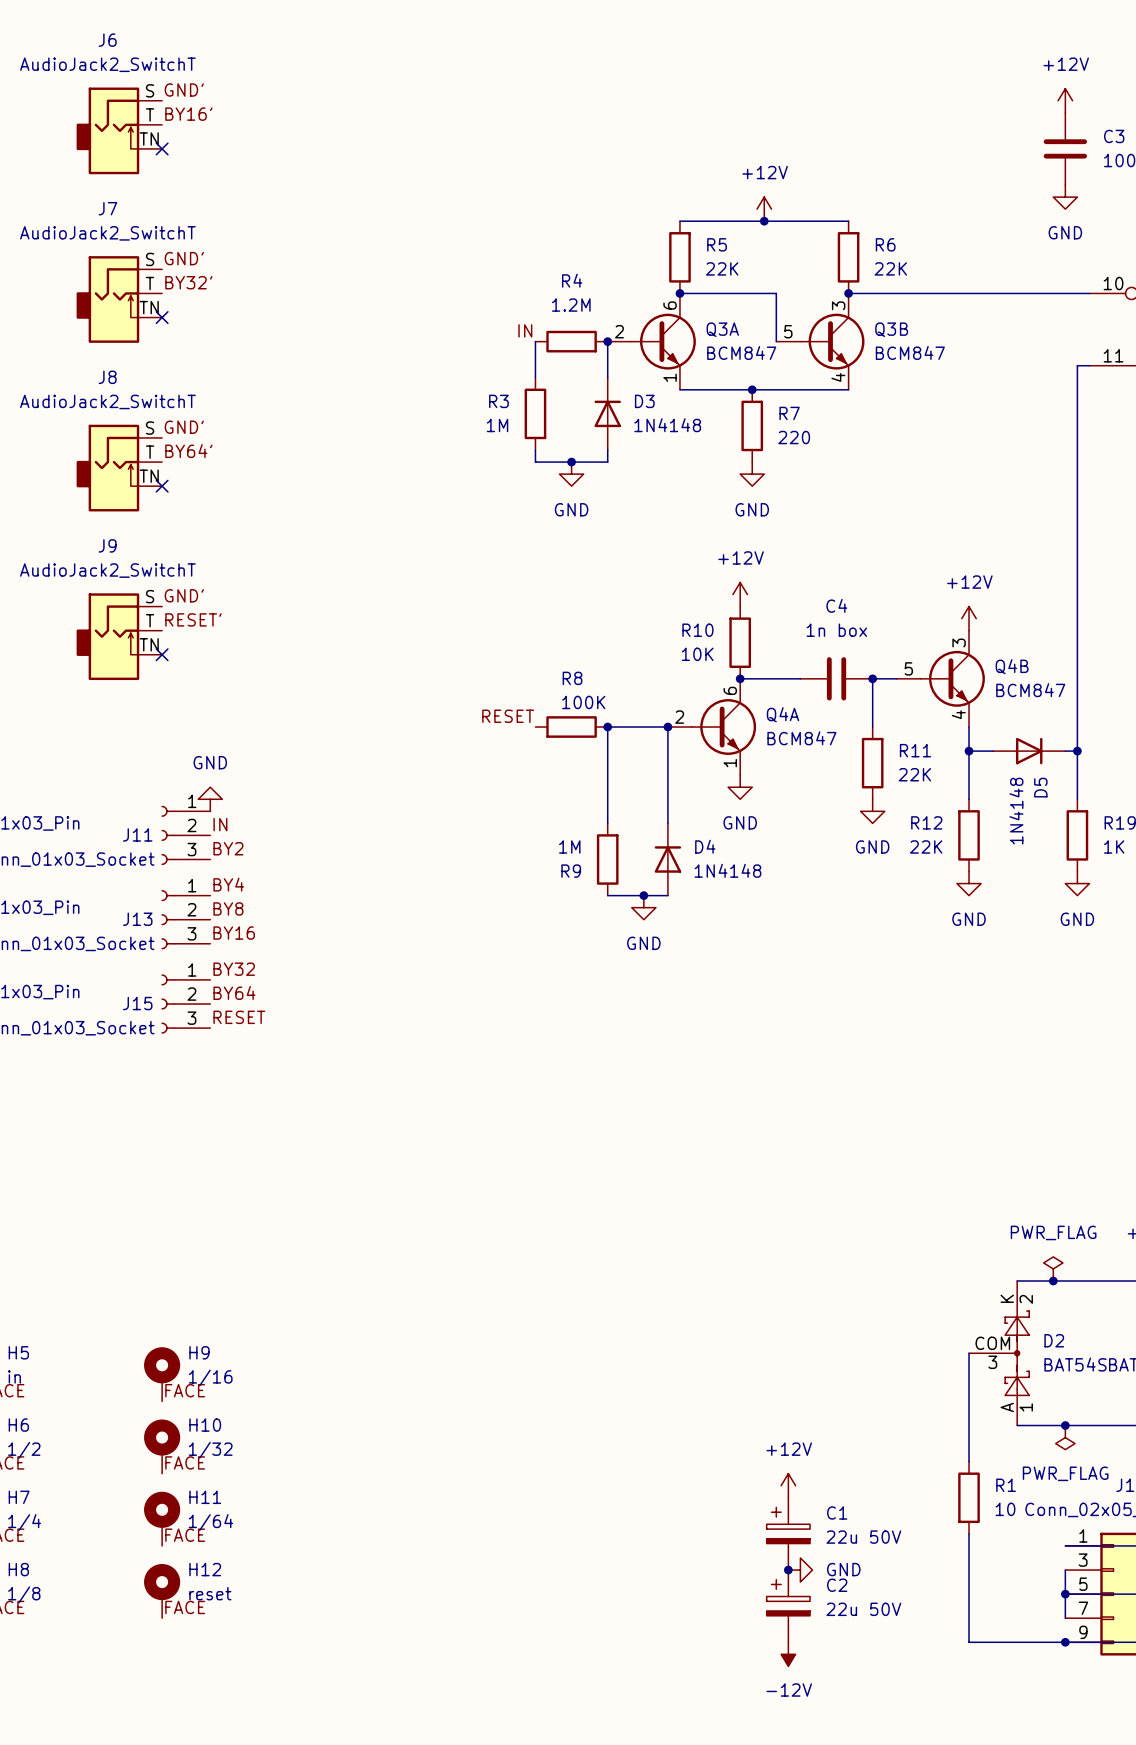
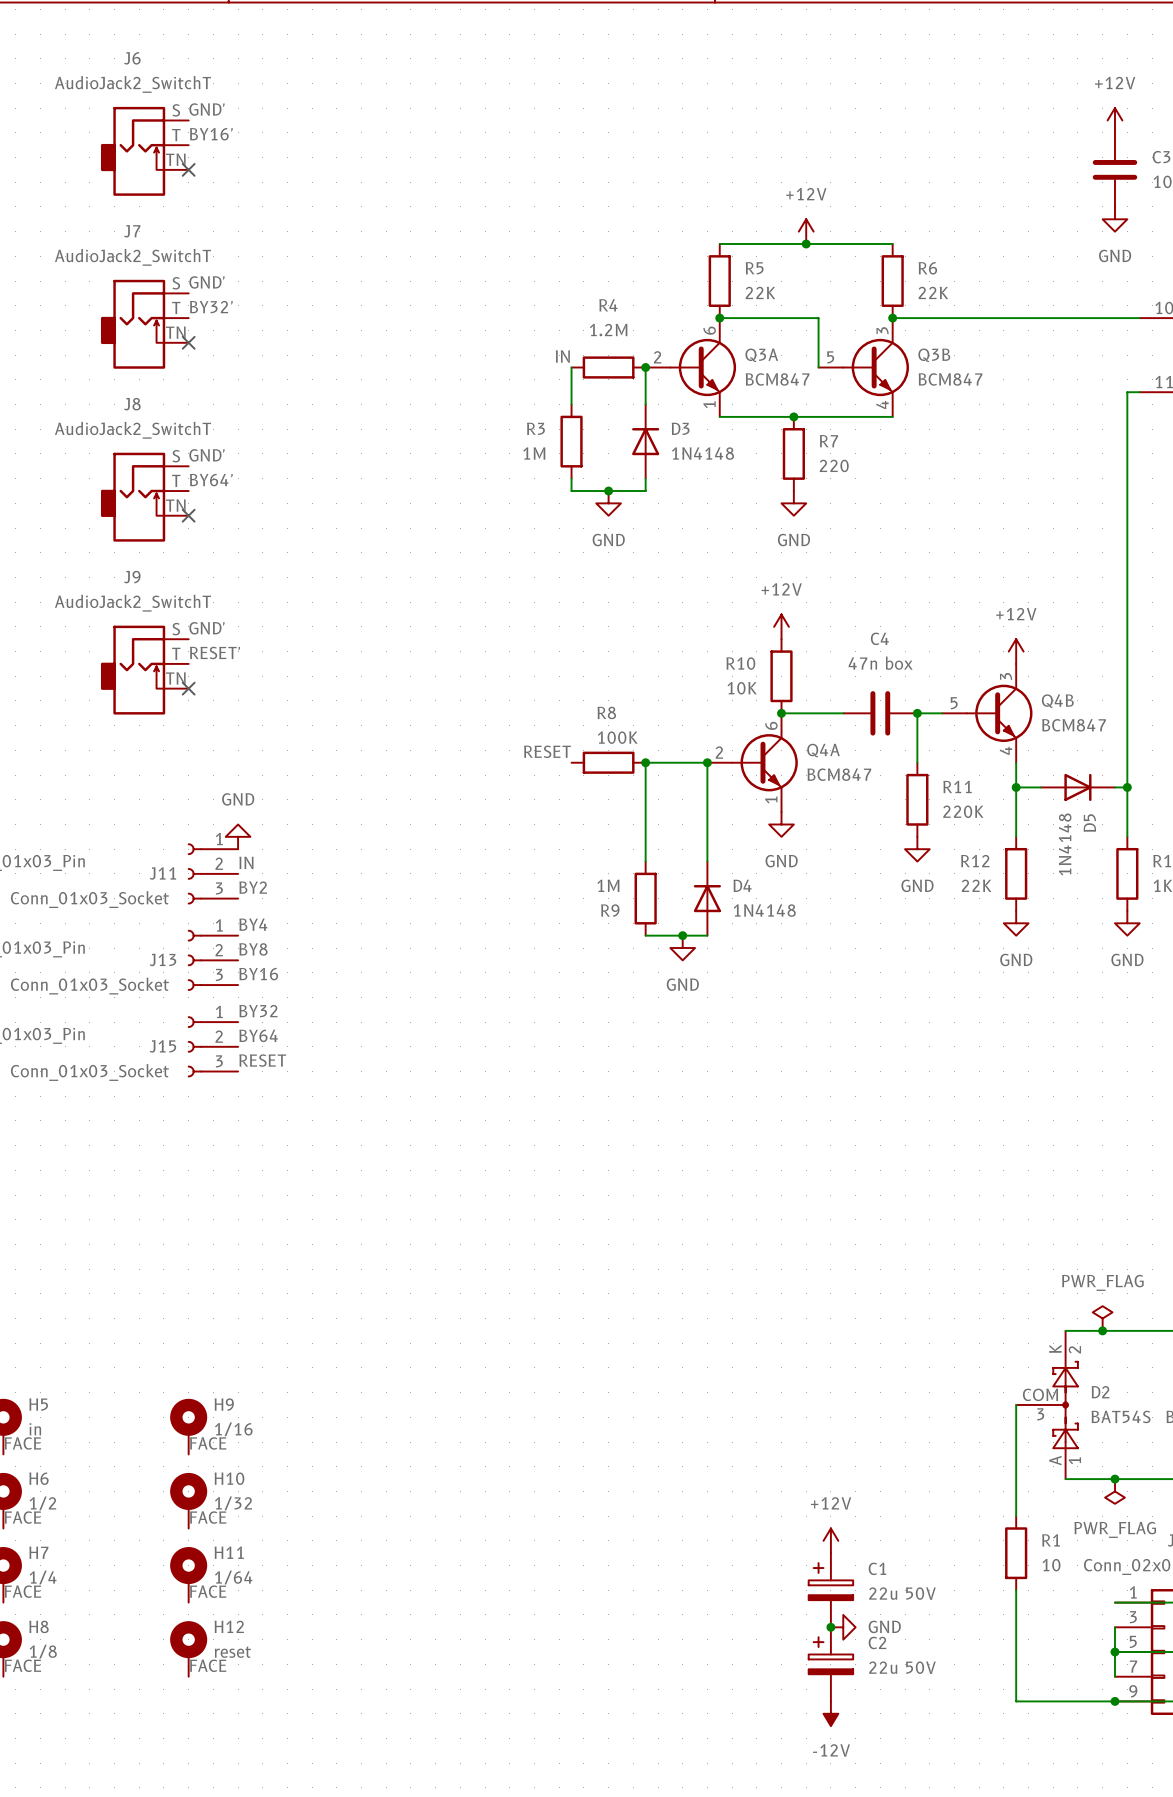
C4 value: 1n box (836, 630) -> 47n box (880, 663)
R11 value: 22K (914, 774) -> 220K (963, 811)

